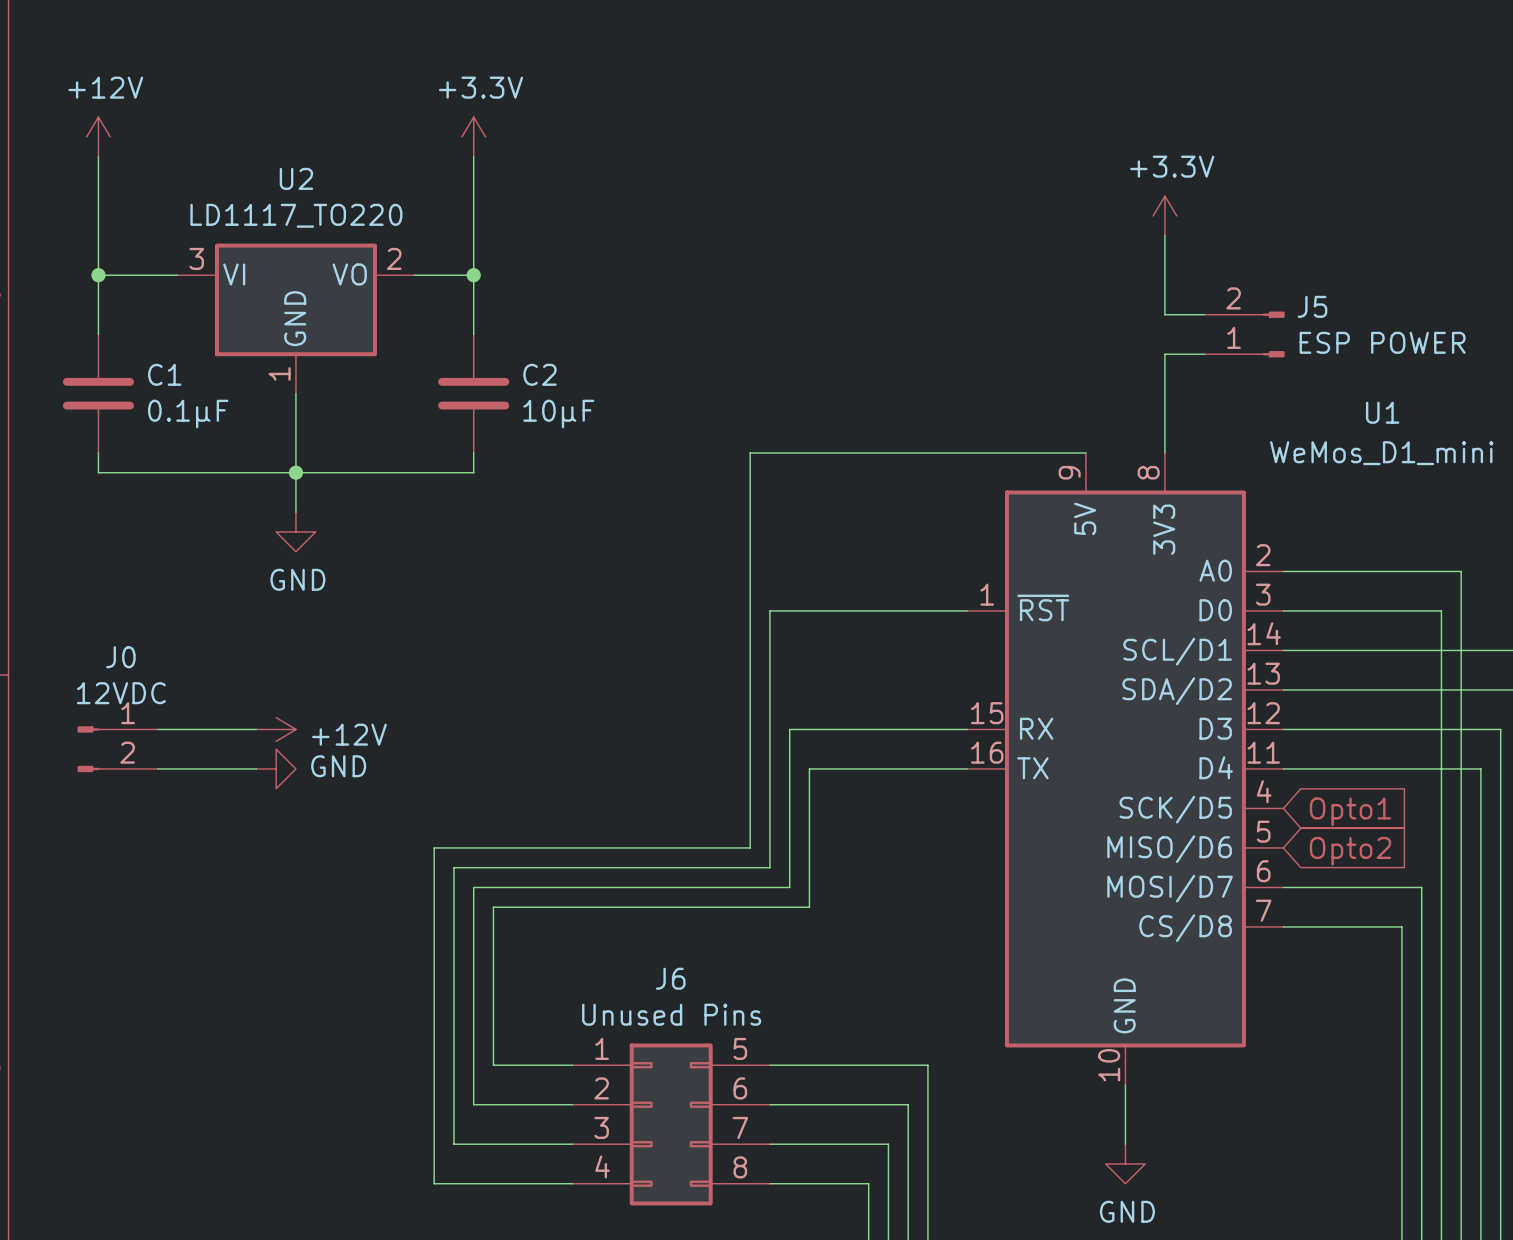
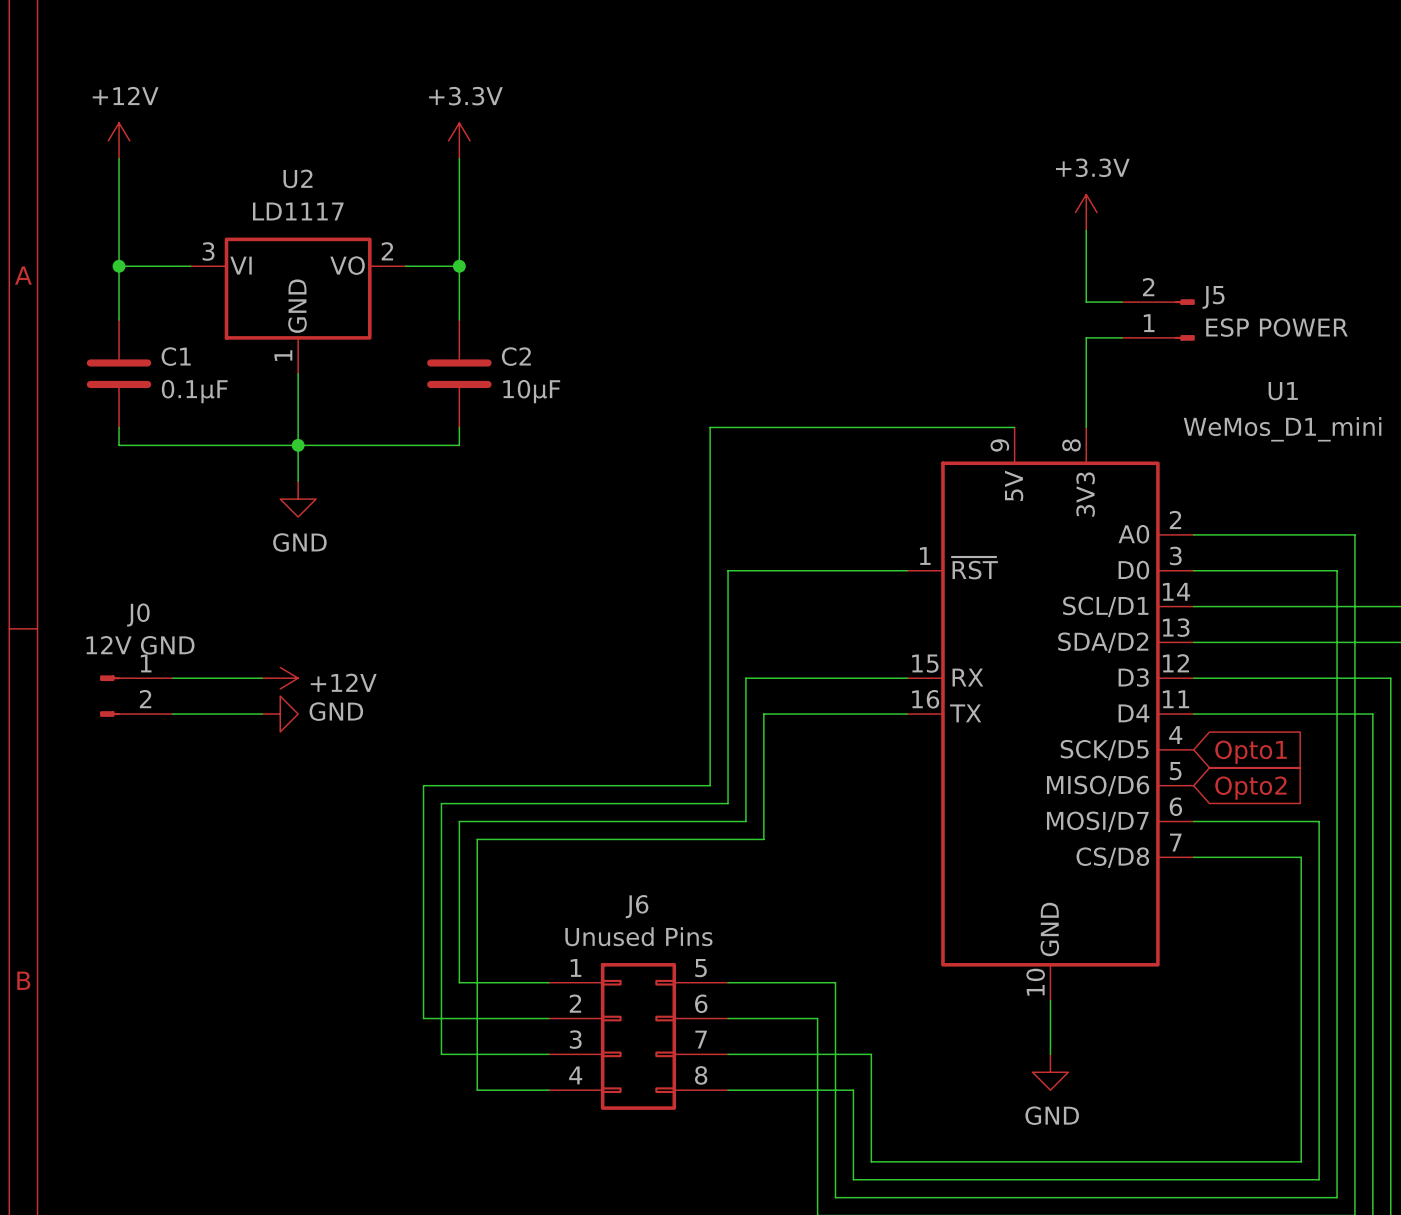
U2 value: LD1117_TO220 (296, 215) -> LD1117 (298, 211)
J0 value: 12VDC (121, 693) -> 12V GND (140, 645)
wire: (473, 1065) (473, 1104) -> (423, 1018) (459, 1018)
wire: (888, 1065) (927, 1065) (927, 1144) -> (835, 982) (835, 1054) (871, 1054)
wire: (434, 1104) (434, 1183) (493, 1183) -> (459, 982) (477, 982) (477, 1090)
wire: (868, 1104) (908, 1104) (908, 1183) -> (817, 1018) (817, 1090) (853, 1090)

